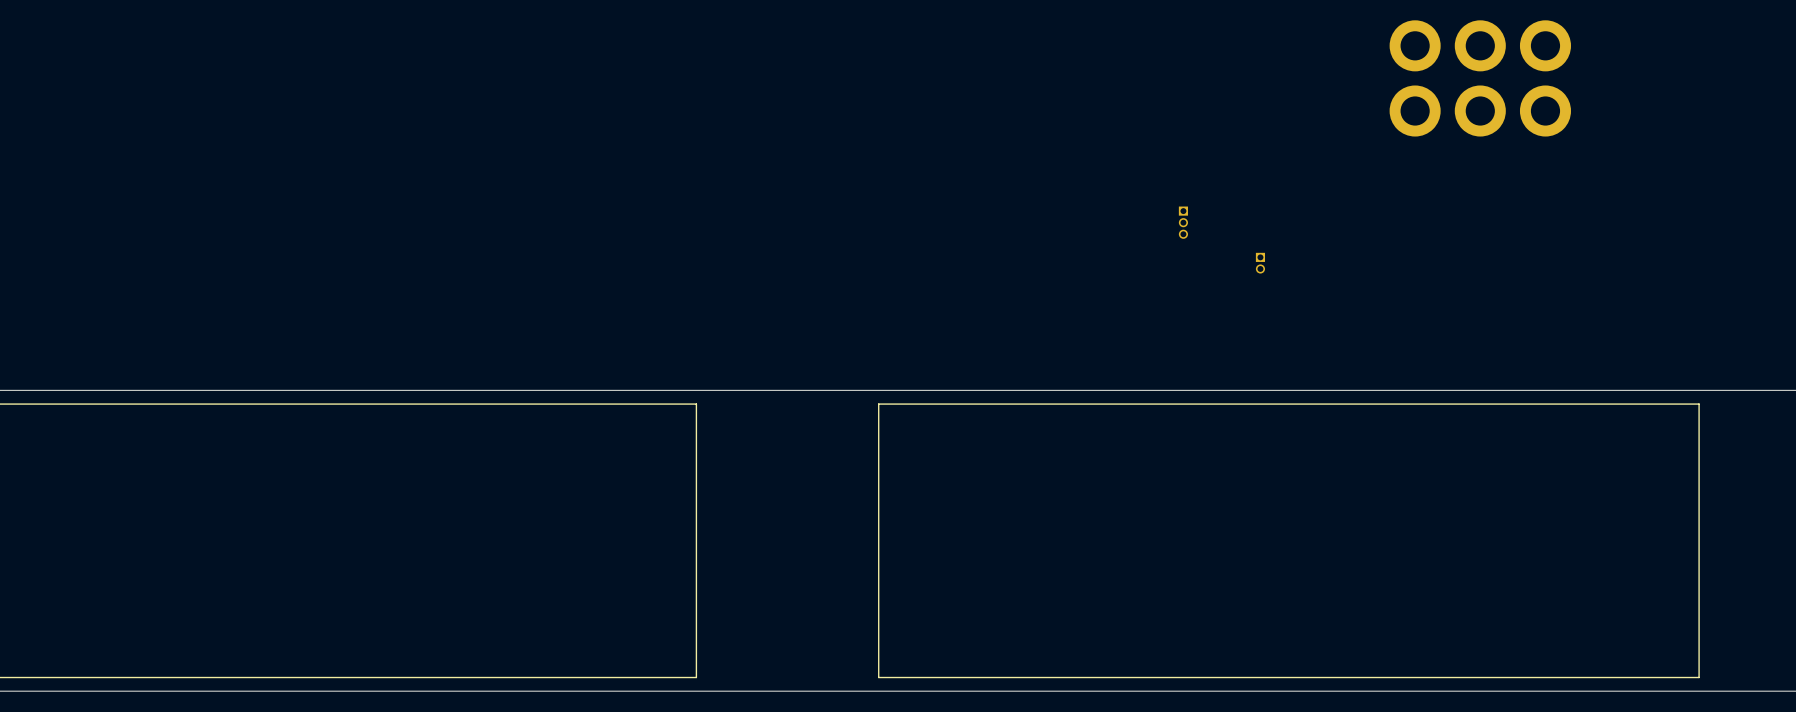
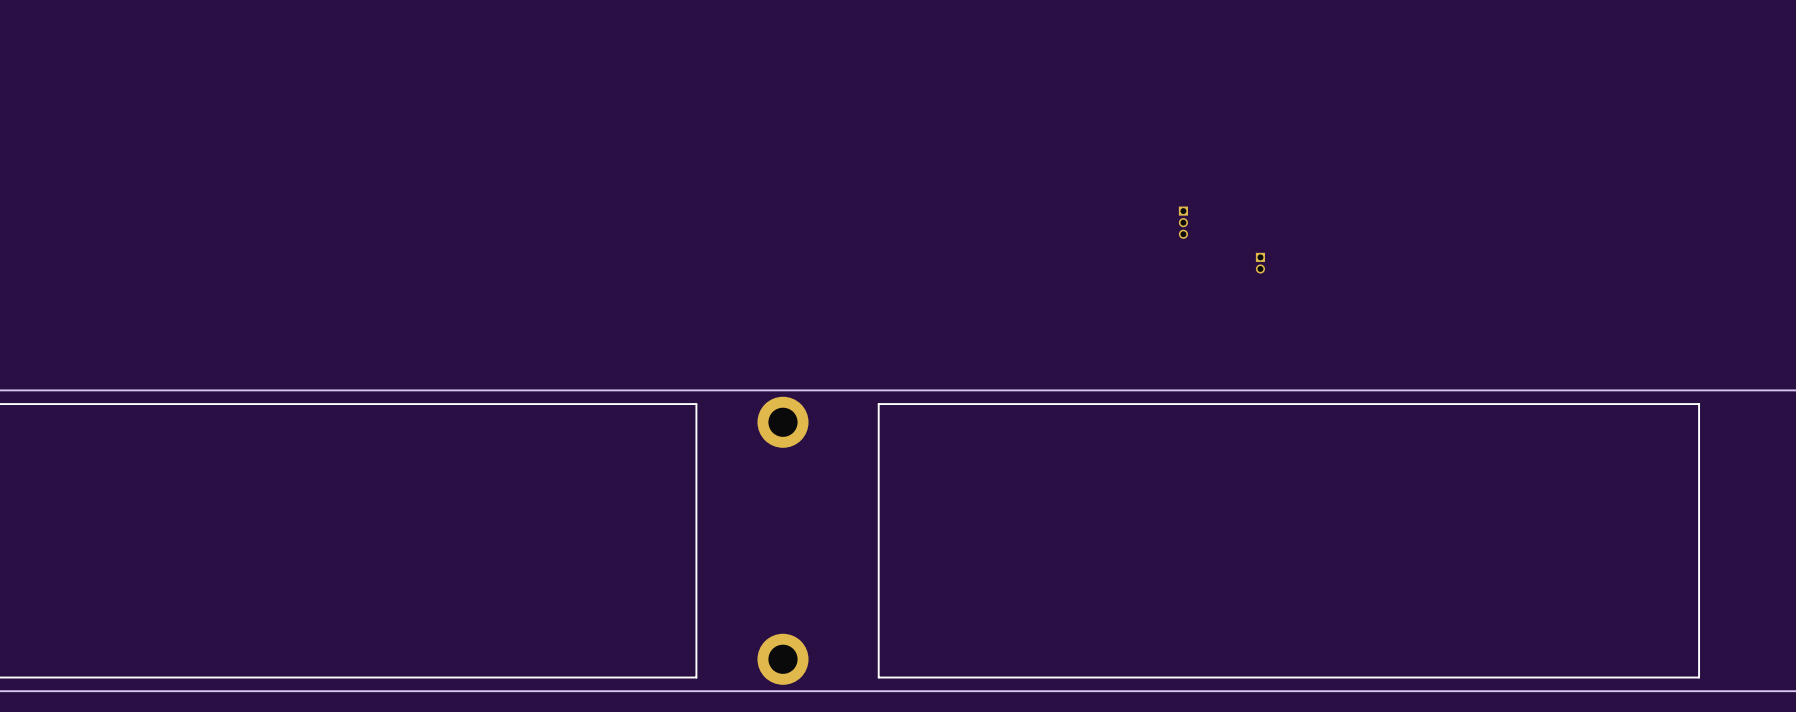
part: (1415, 45) -> none
part: (1480, 45) -> none
part: (1545, 45) -> none
part: (1415, 111) -> none
part: (1480, 111) -> none
part: (1545, 111) -> none
part: none -> (783, 422)
part: none -> (783, 659)

